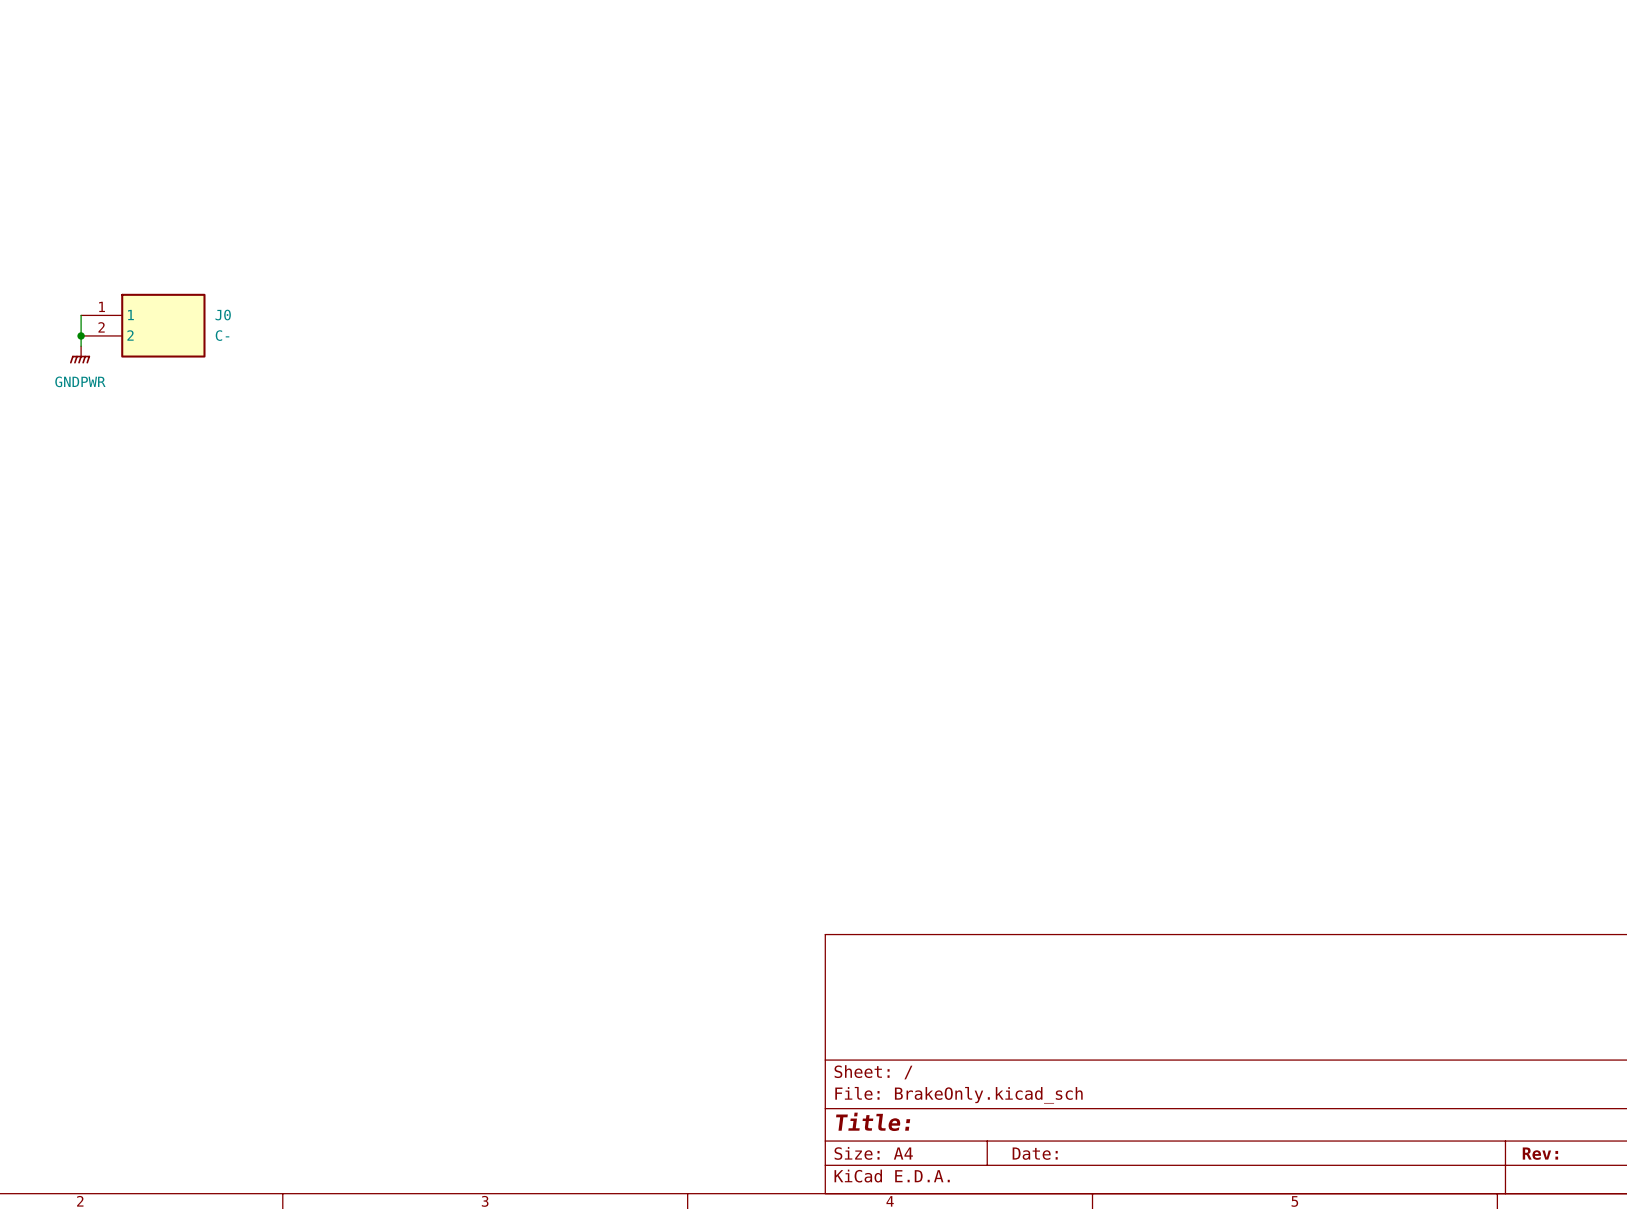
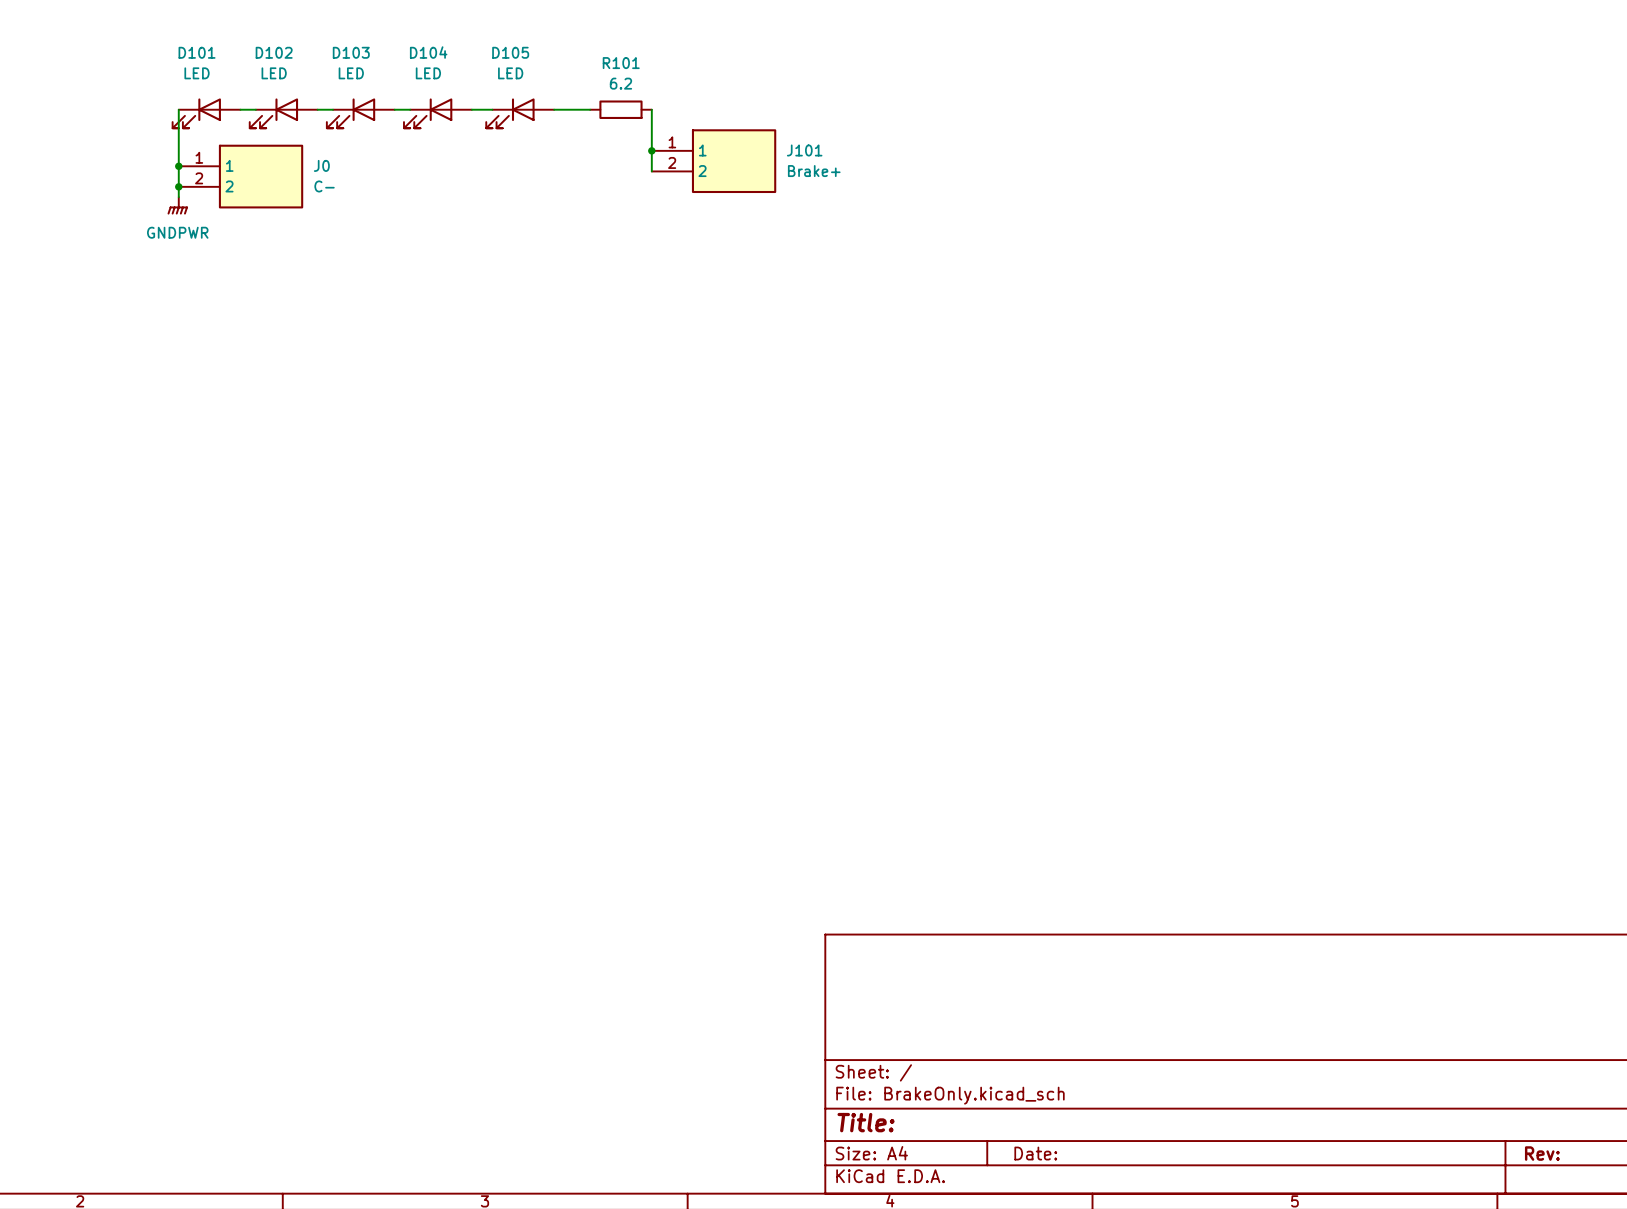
wire: none -> (178, 109) (178, 197)
wire: none -> (240, 109) (255, 109)
wire: none -> (317, 109) (333, 109)
wire: none -> (394, 109) (410, 109)
wire: none -> (471, 109) (492, 109)
wire: none -> (554, 109) (590, 109)
R101: none -> 6.2 (620, 109)
wire: none -> (651, 109) (651, 171)
D101: none -> LED (206, 113)
D102: none -> LED (283, 113)
D103: none -> LED (360, 113)
D104: none -> LED (437, 113)
D105: none -> LED (520, 113)
junction: none -> (651, 150)
J101: none -> Brake+ (714, 161)
junction: none -> (178, 166)
junction: none -> (178, 186)
wire: (81, 315) (81, 346) -> none
J0 position: (143, 325) -> (241, 176)
junction: (81, 335) -> none
power symbol position: GNDPWR (80, 354) -> GNDPWR (177, 205)

